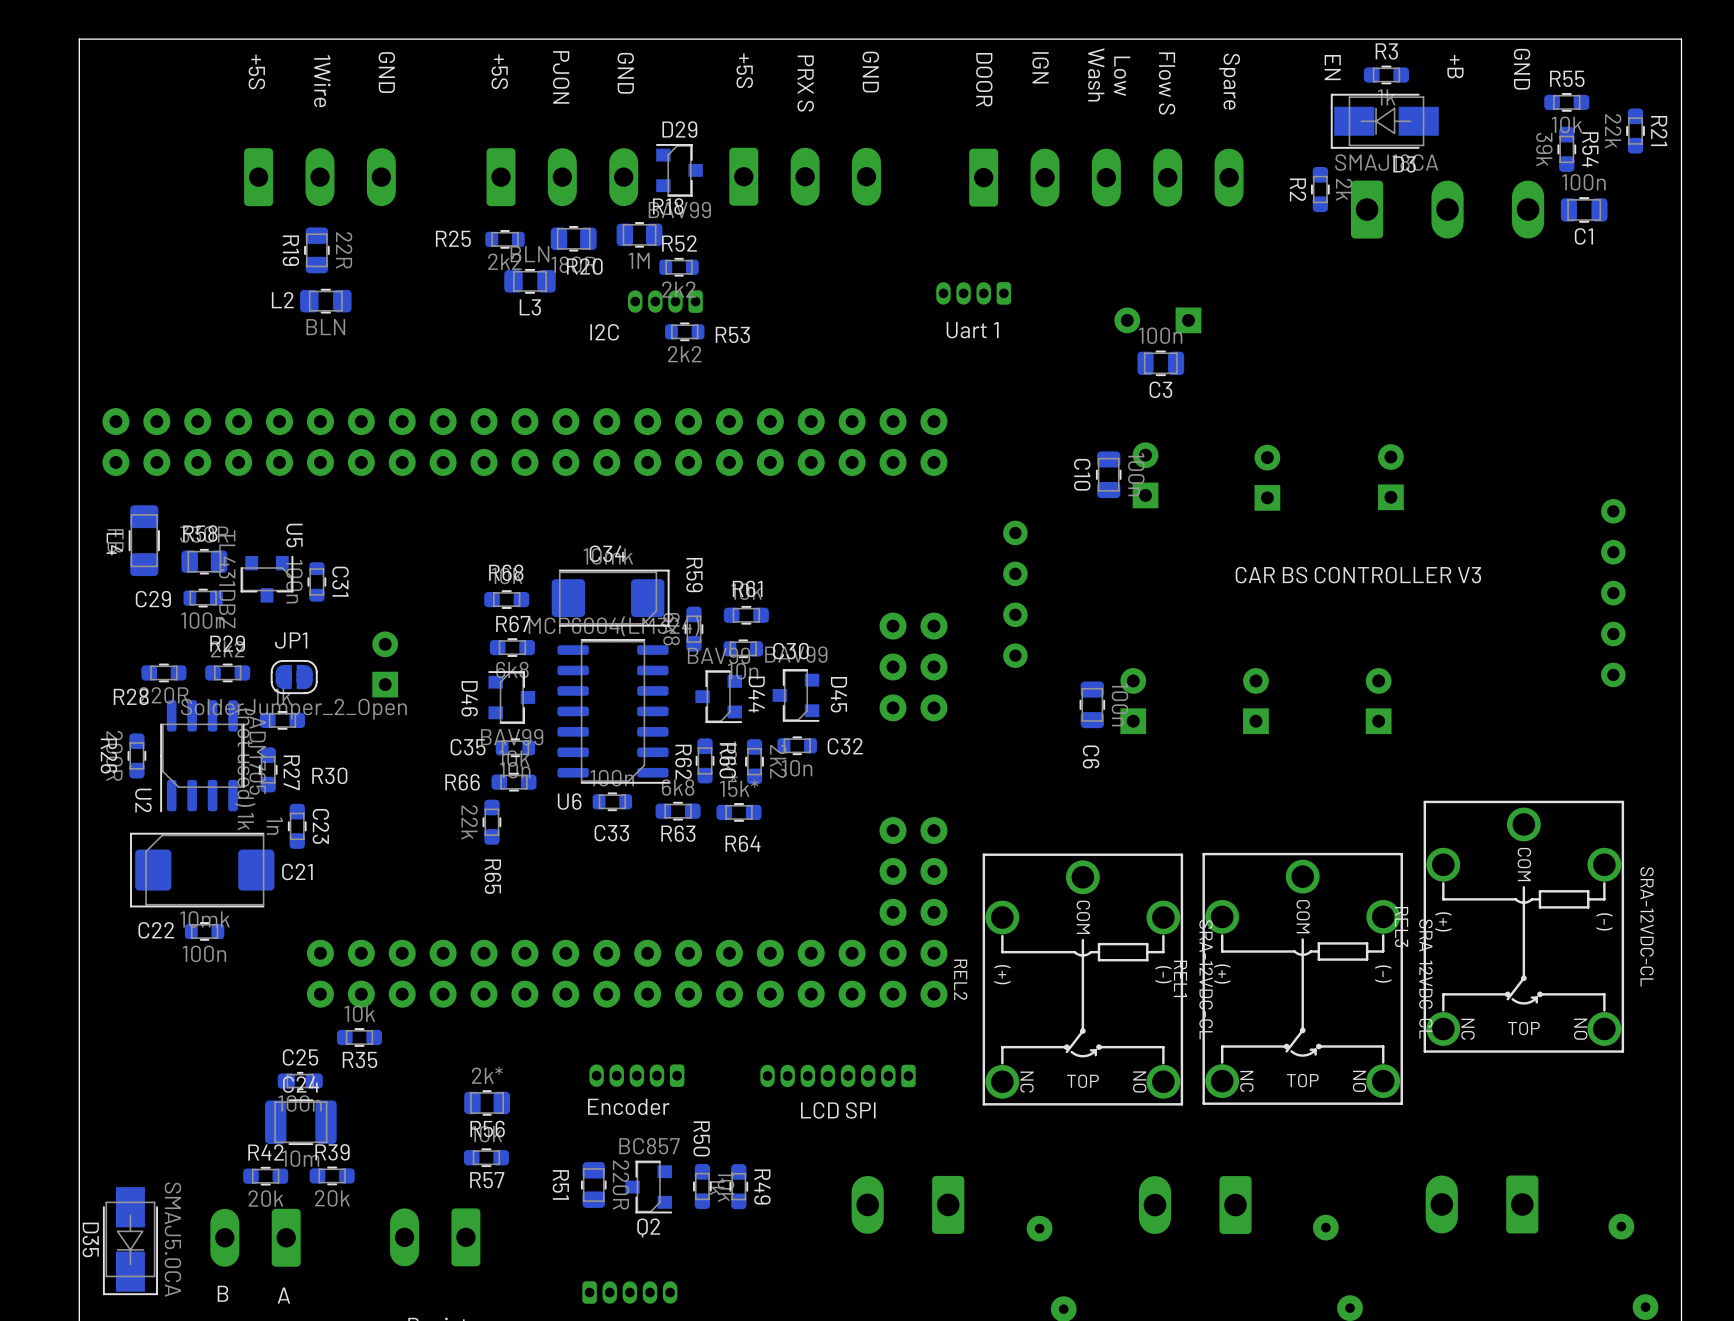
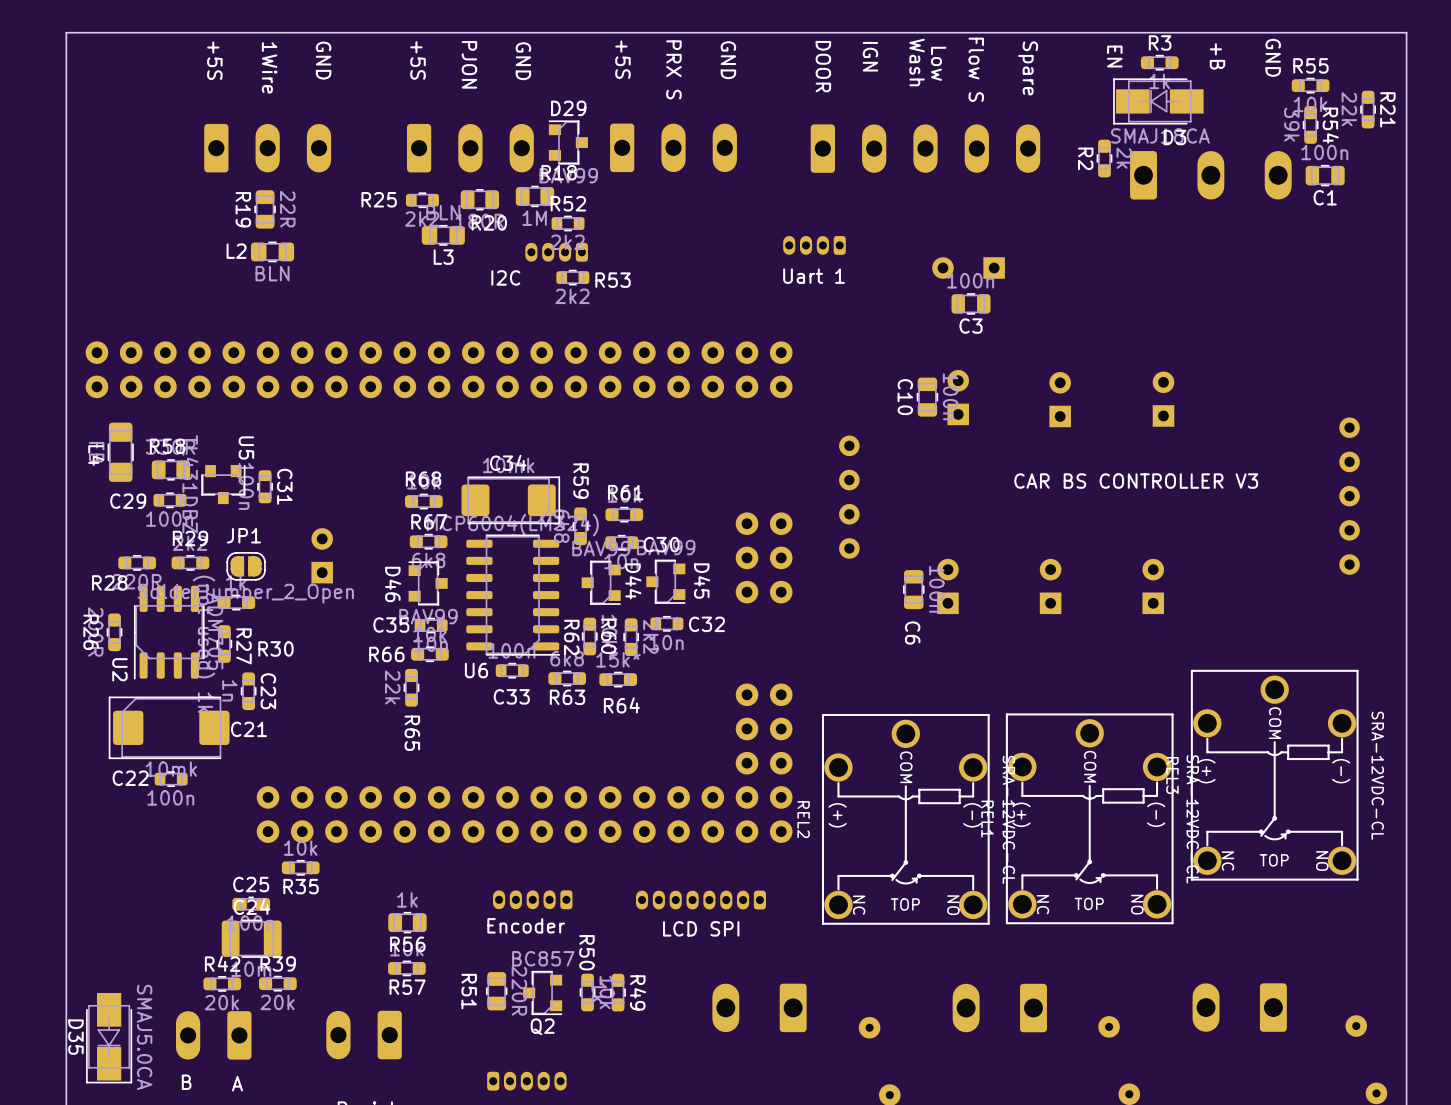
R56 value: 2k* (487, 1075) -> 1k (407, 899)

